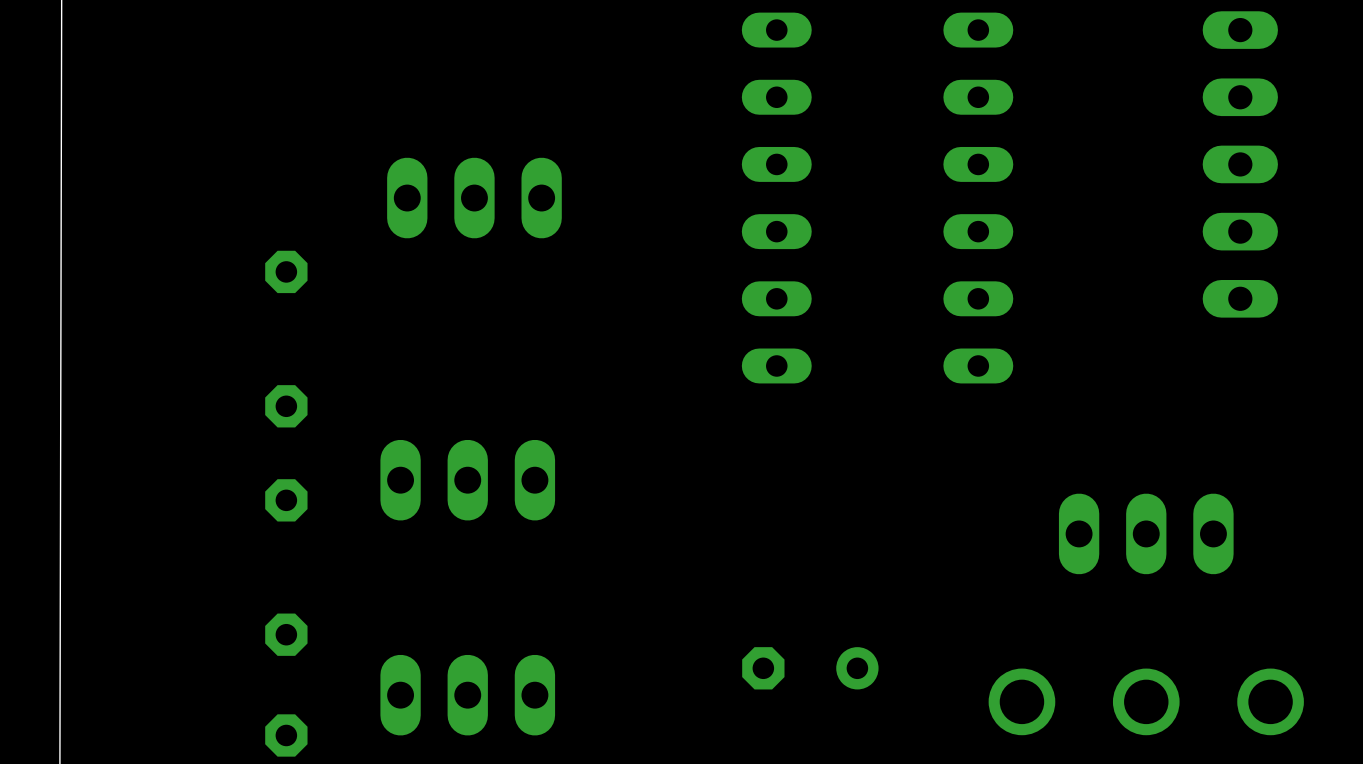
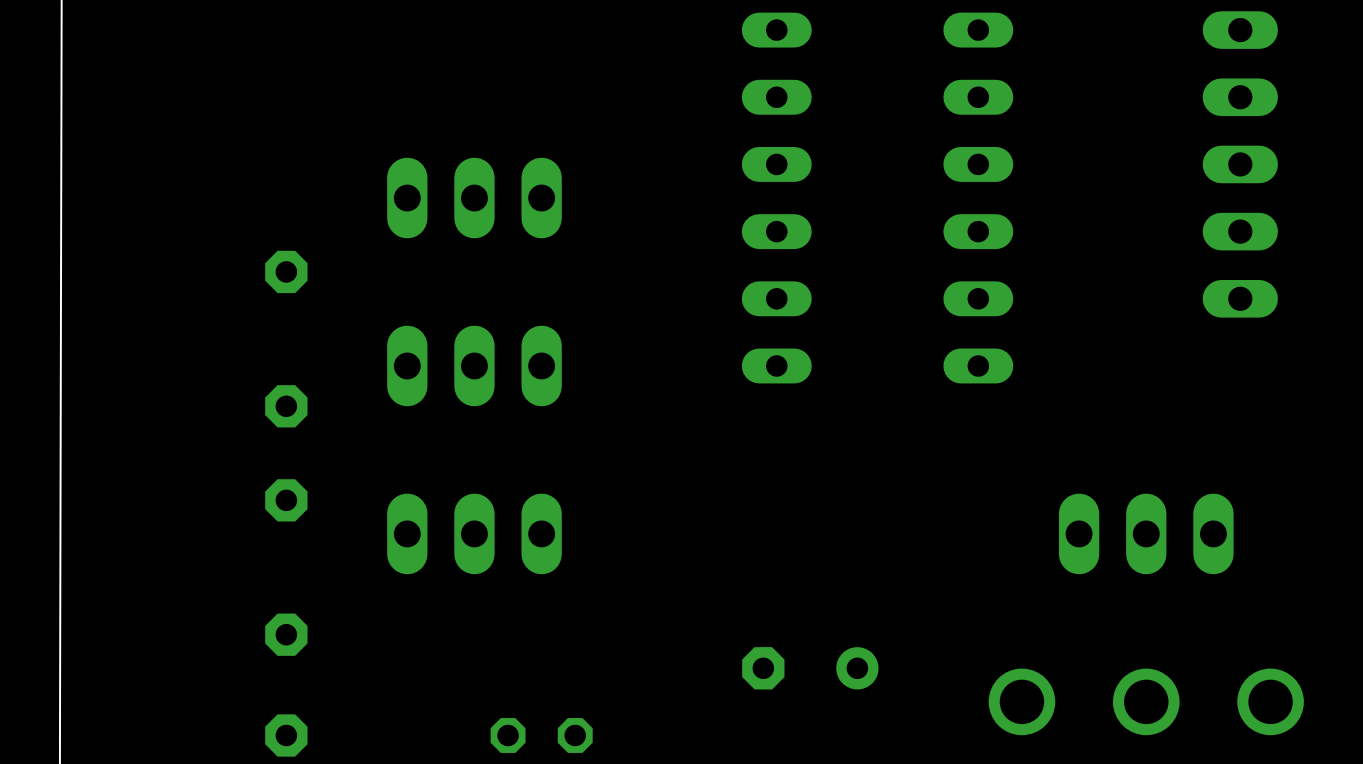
part: none -> (474, 365)
part position: (467, 480) -> (474, 533)
part: (467, 695) -> none
part: none -> (541, 735)

